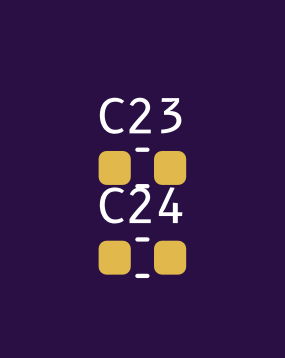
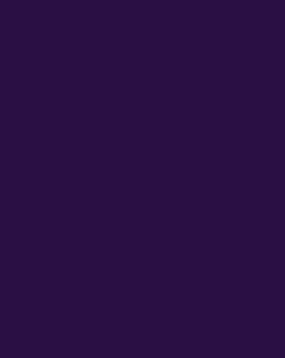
C23: (142, 167) -> none
C24: (142, 257) -> none

